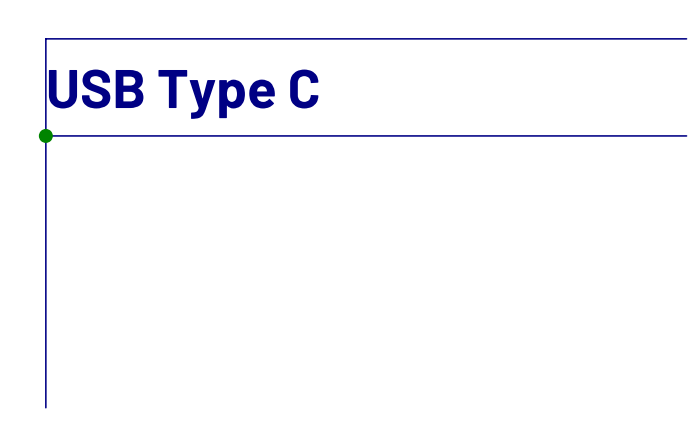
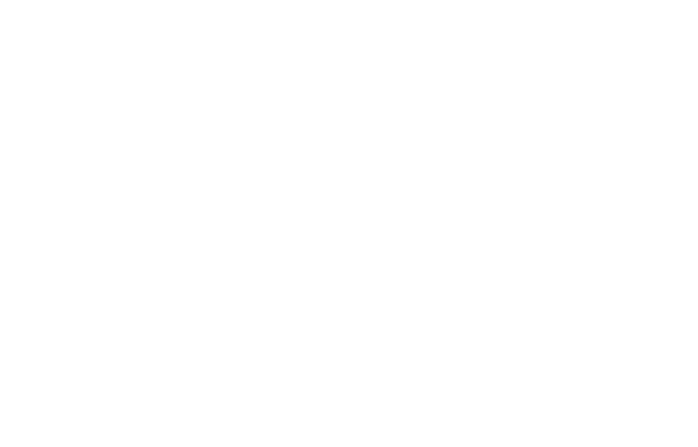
bus: (686, 38) (45, 38) (45, 407) -> none
text: USB Type C (183, 94) -> none
bus: (45, 135) (686, 135) -> none
junction: (45, 135) -> none

